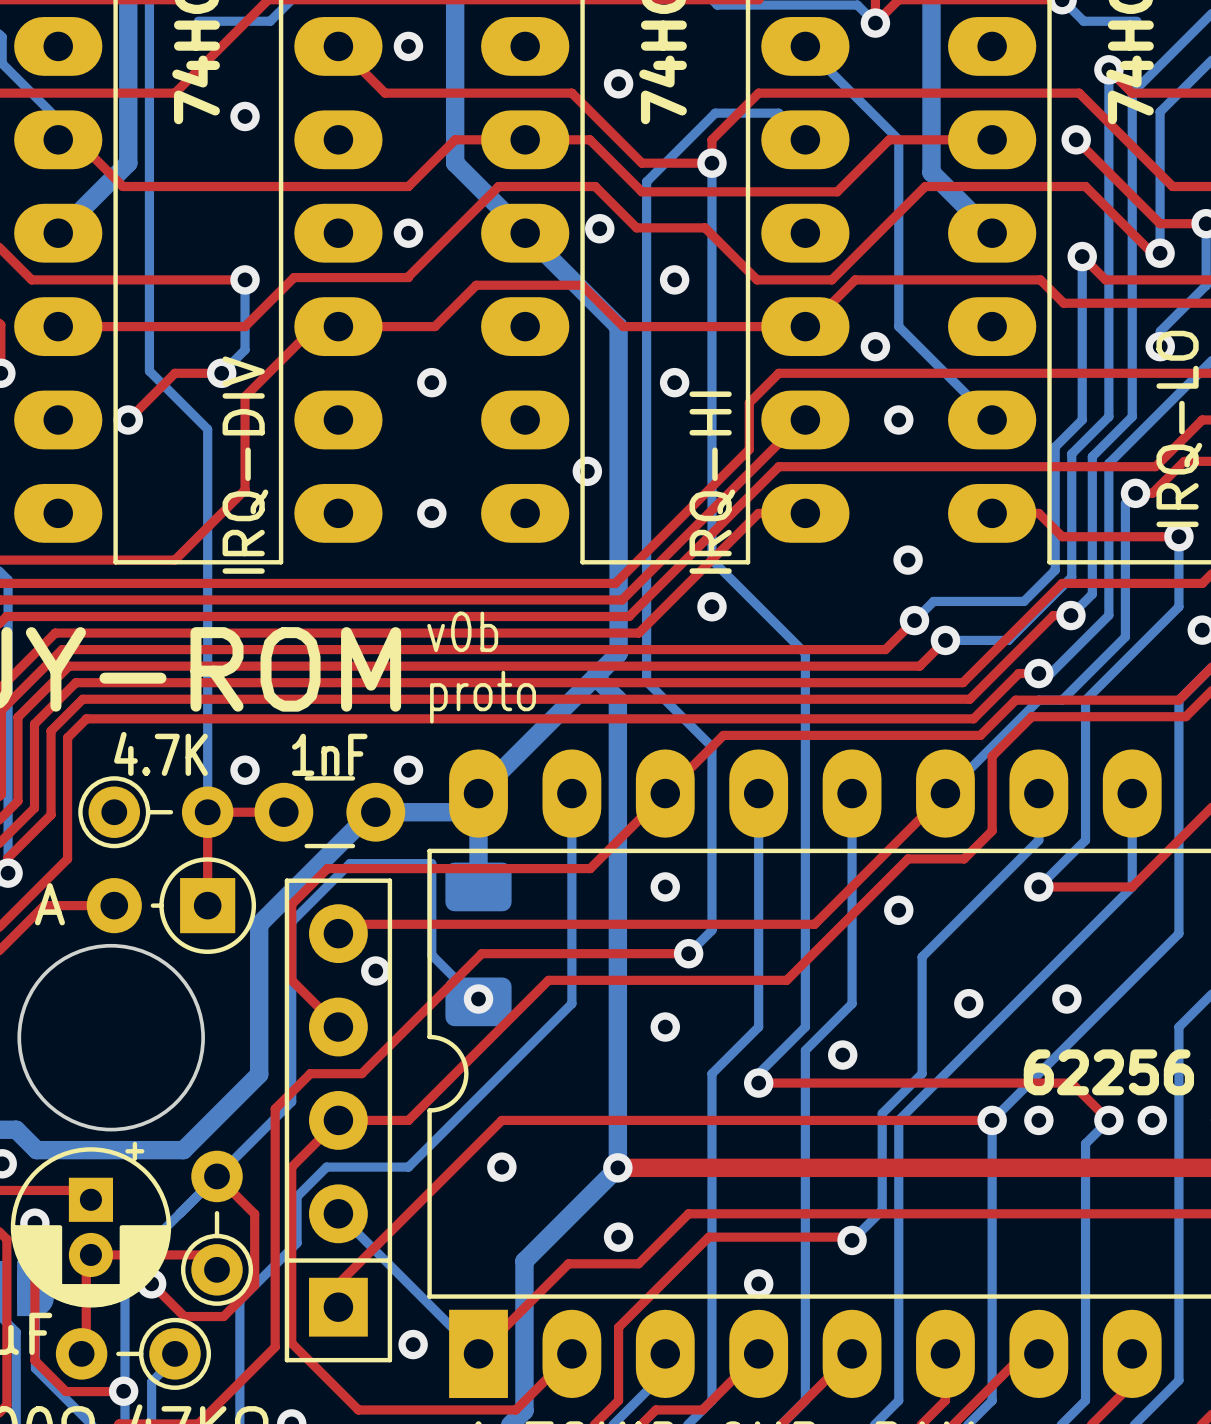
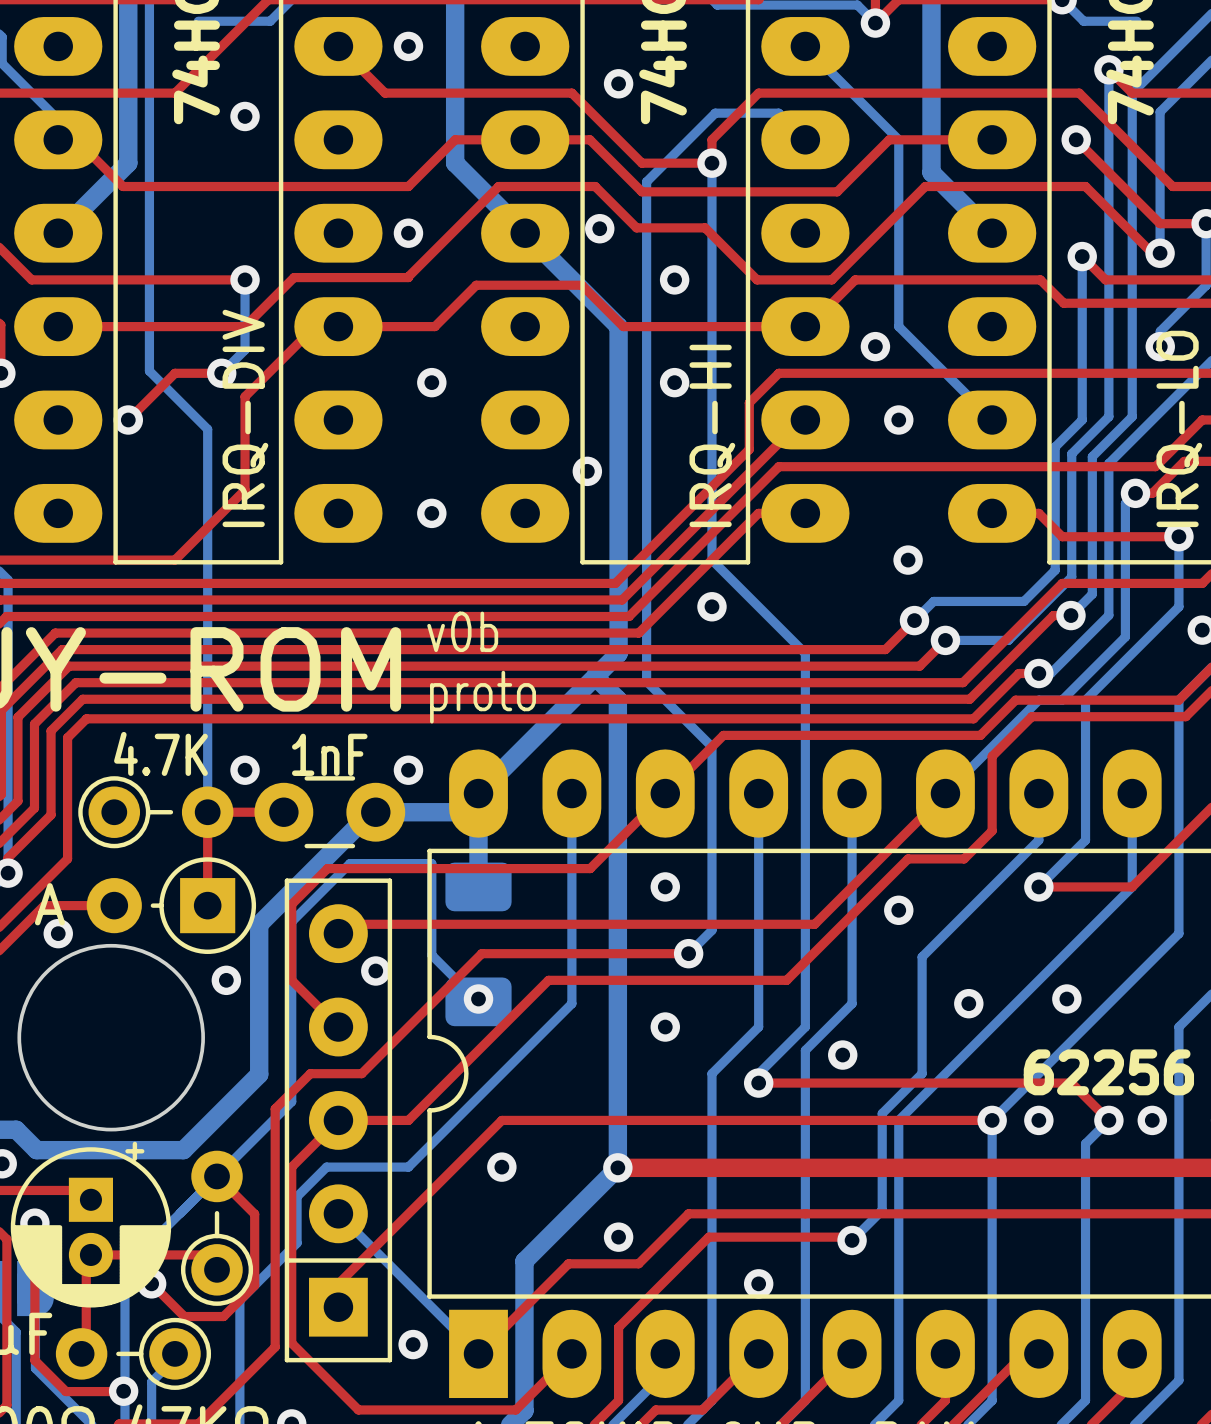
text position: IRQ-DIV (245, 465) -> IRQ-DIV (245, 418)
text position: IRQ-HI (712, 482) -> IRQ-HI (712, 435)
via: none -> (58, 933)
via: none -> (226, 980)

